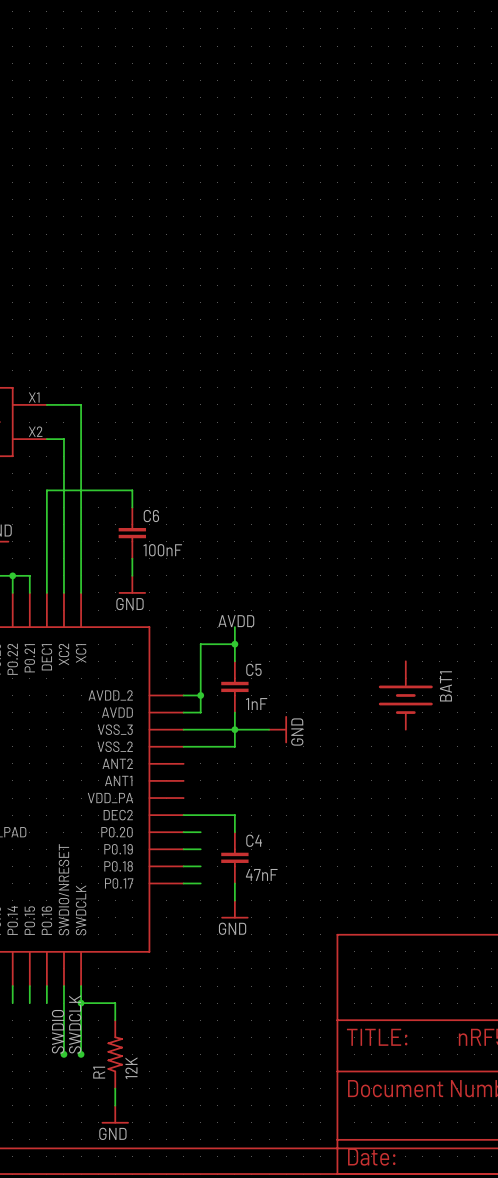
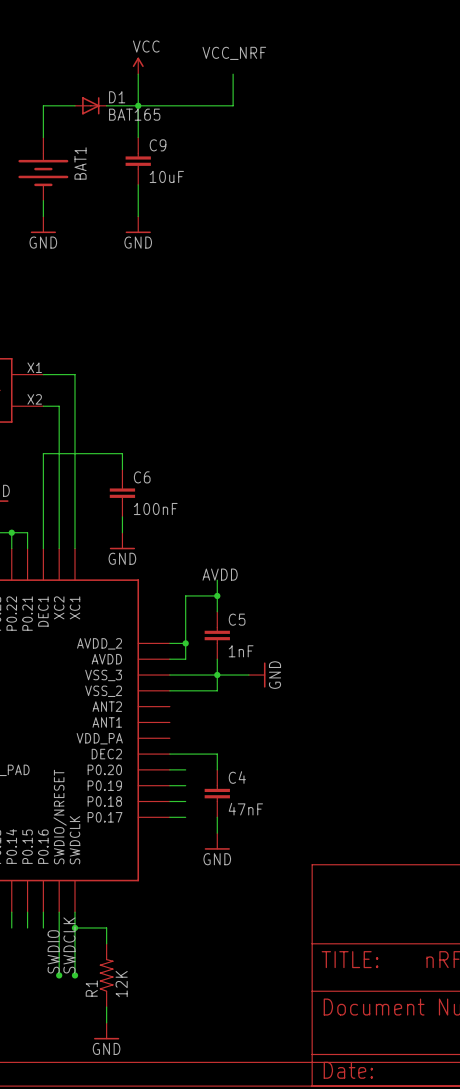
label: none -> VCC_NRF (234, 53)
power symbol: none -> VCC (138, 65)
wire: none -> (138, 74) (138, 137)
wire: none -> (233, 74) (233, 105) (106, 105)
wire: none -> (75, 105) (43, 105) (43, 137)
D1: none -> BAT165 (90, 105)
junction: none -> (138, 105)
C9: none -> 10uF (138, 161)
wire: none -> (138, 184) (138, 216)
wire: none -> (43, 200) (43, 216)
power symbol: none -> GND (43, 224)
power symbol: none -> GND (138, 224)
BAT1 position: (405, 695) -> (43, 169)

